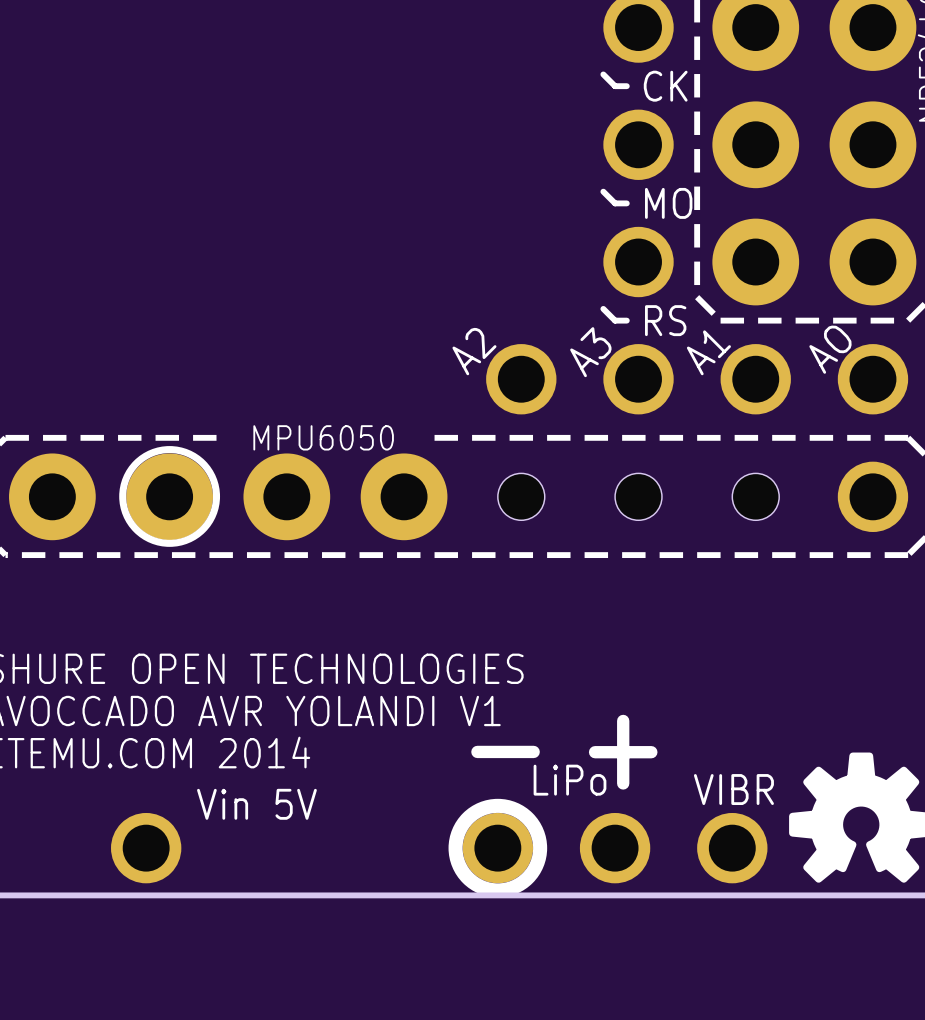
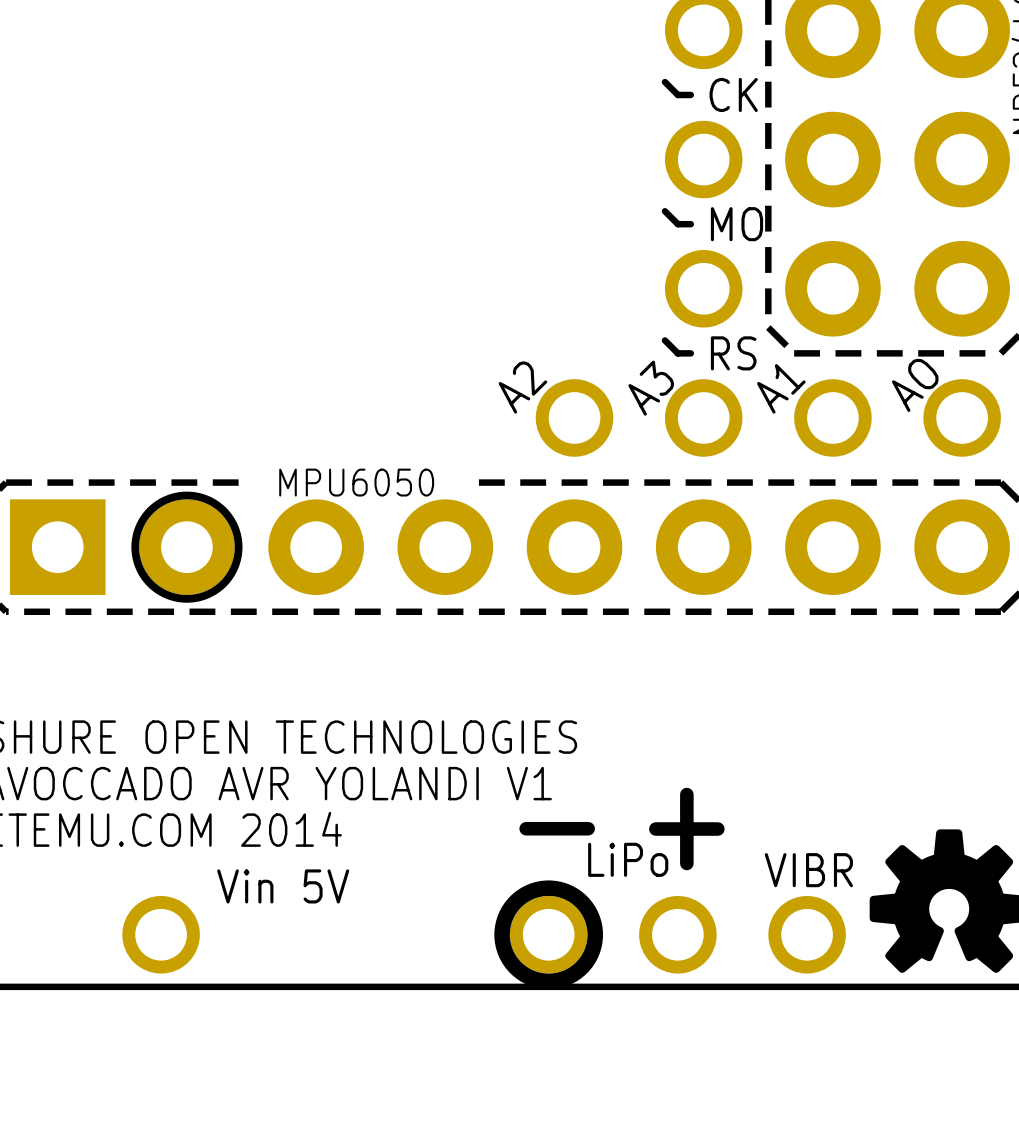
part: (111, 496) -> none
part: (345, 496) -> none
part: none -> (509, 547)
hole: (521, 496) -> none
hole: (638, 496) -> none
hole: (755, 496) -> none
part: (872, 496) -> none

